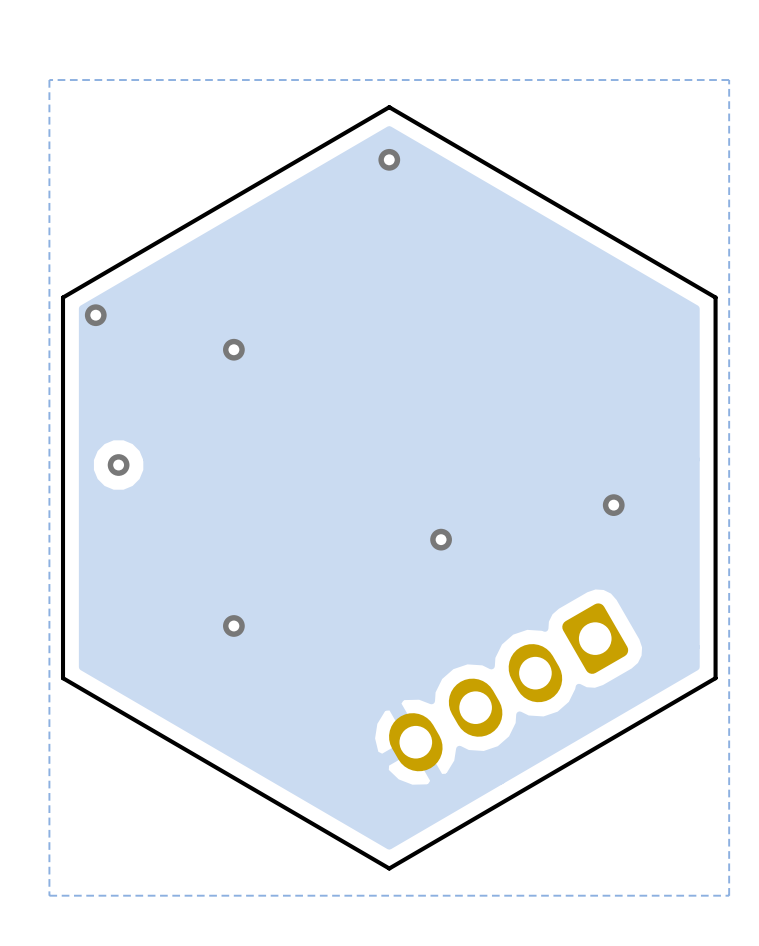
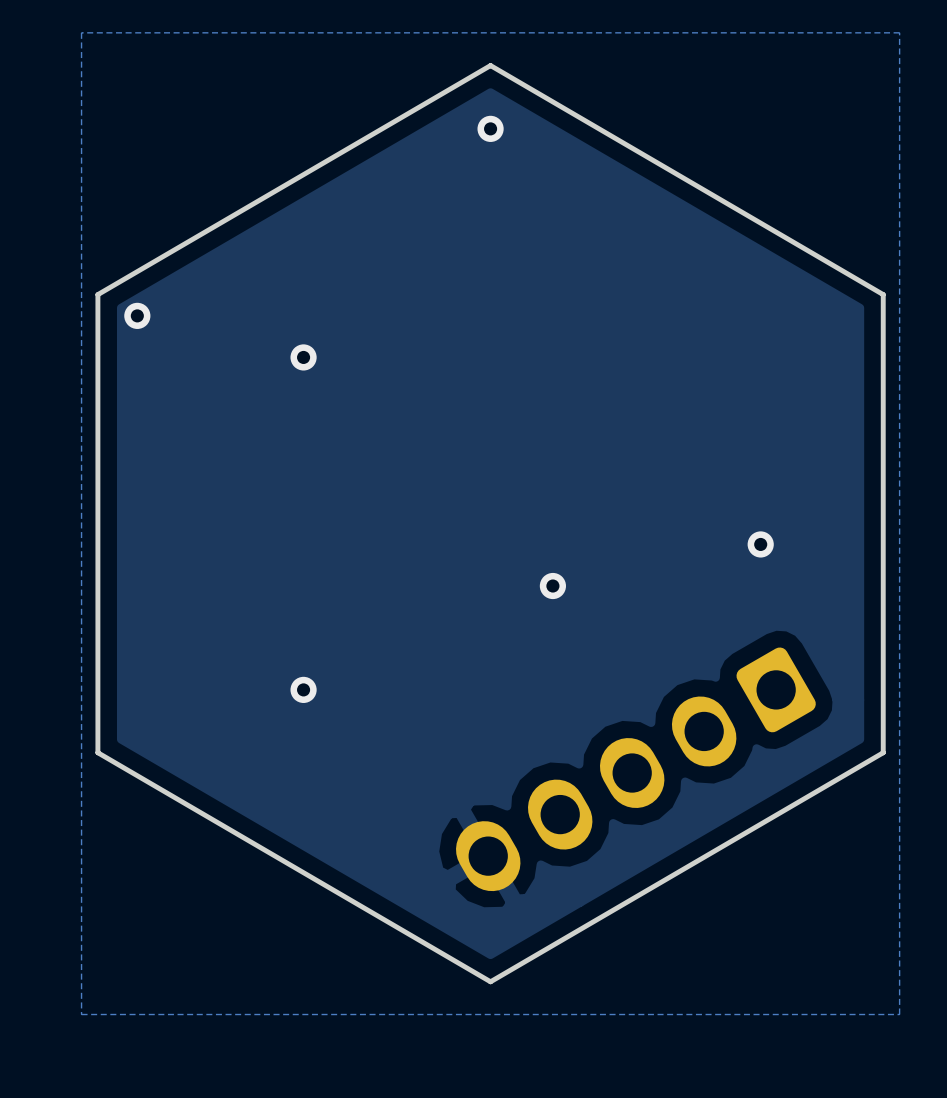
via: (118, 465) -> none
part footprint: [389, 603, 629, 772] -> [456, 647, 816, 892]

